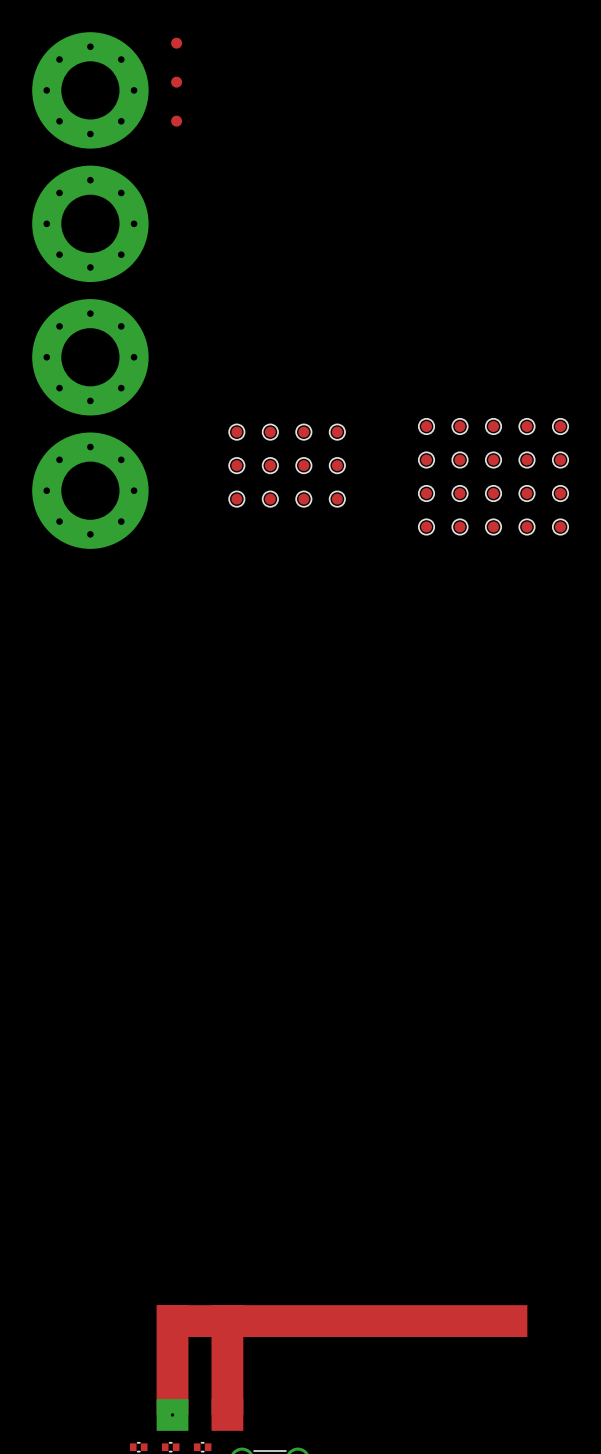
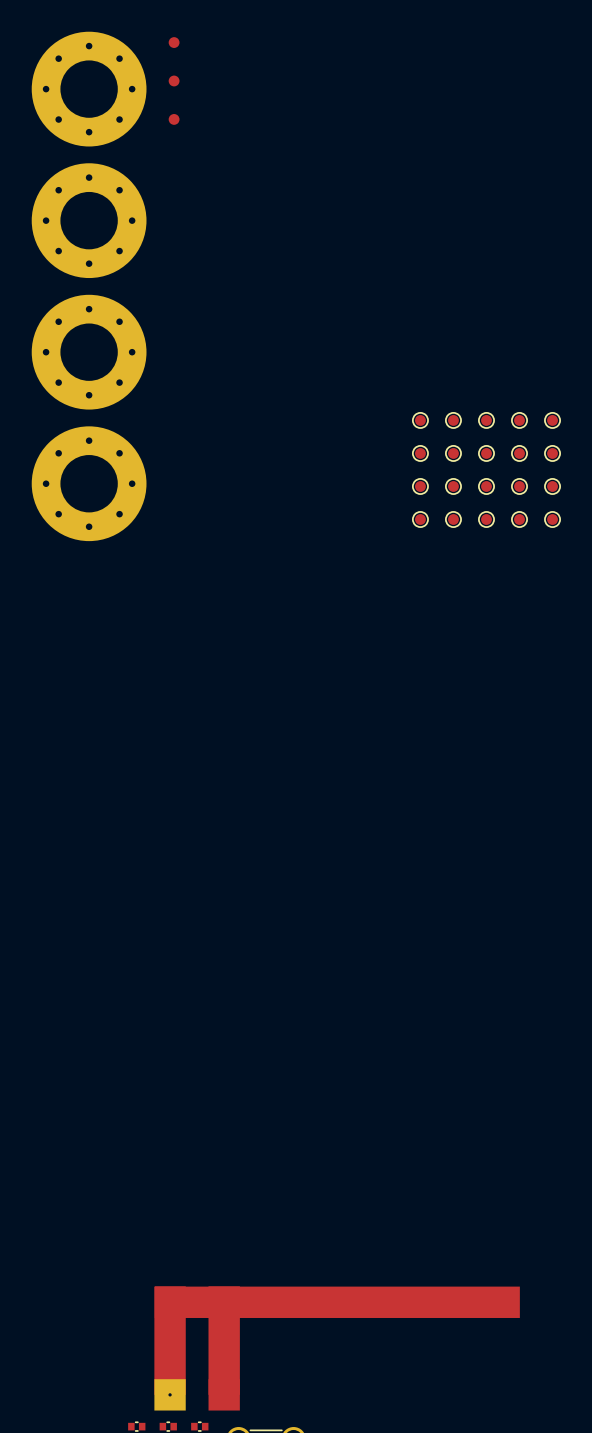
part: (236, 432) -> none
part: (270, 432) -> none
part: (303, 432) -> none
part: (337, 432) -> none
part: (236, 465) -> none
part: (270, 465) -> none
part: (303, 465) -> none
part: (337, 465) -> none
part: (236, 499) -> none
part: (270, 499) -> none
part: (303, 499) -> none
part: (337, 499) -> none

